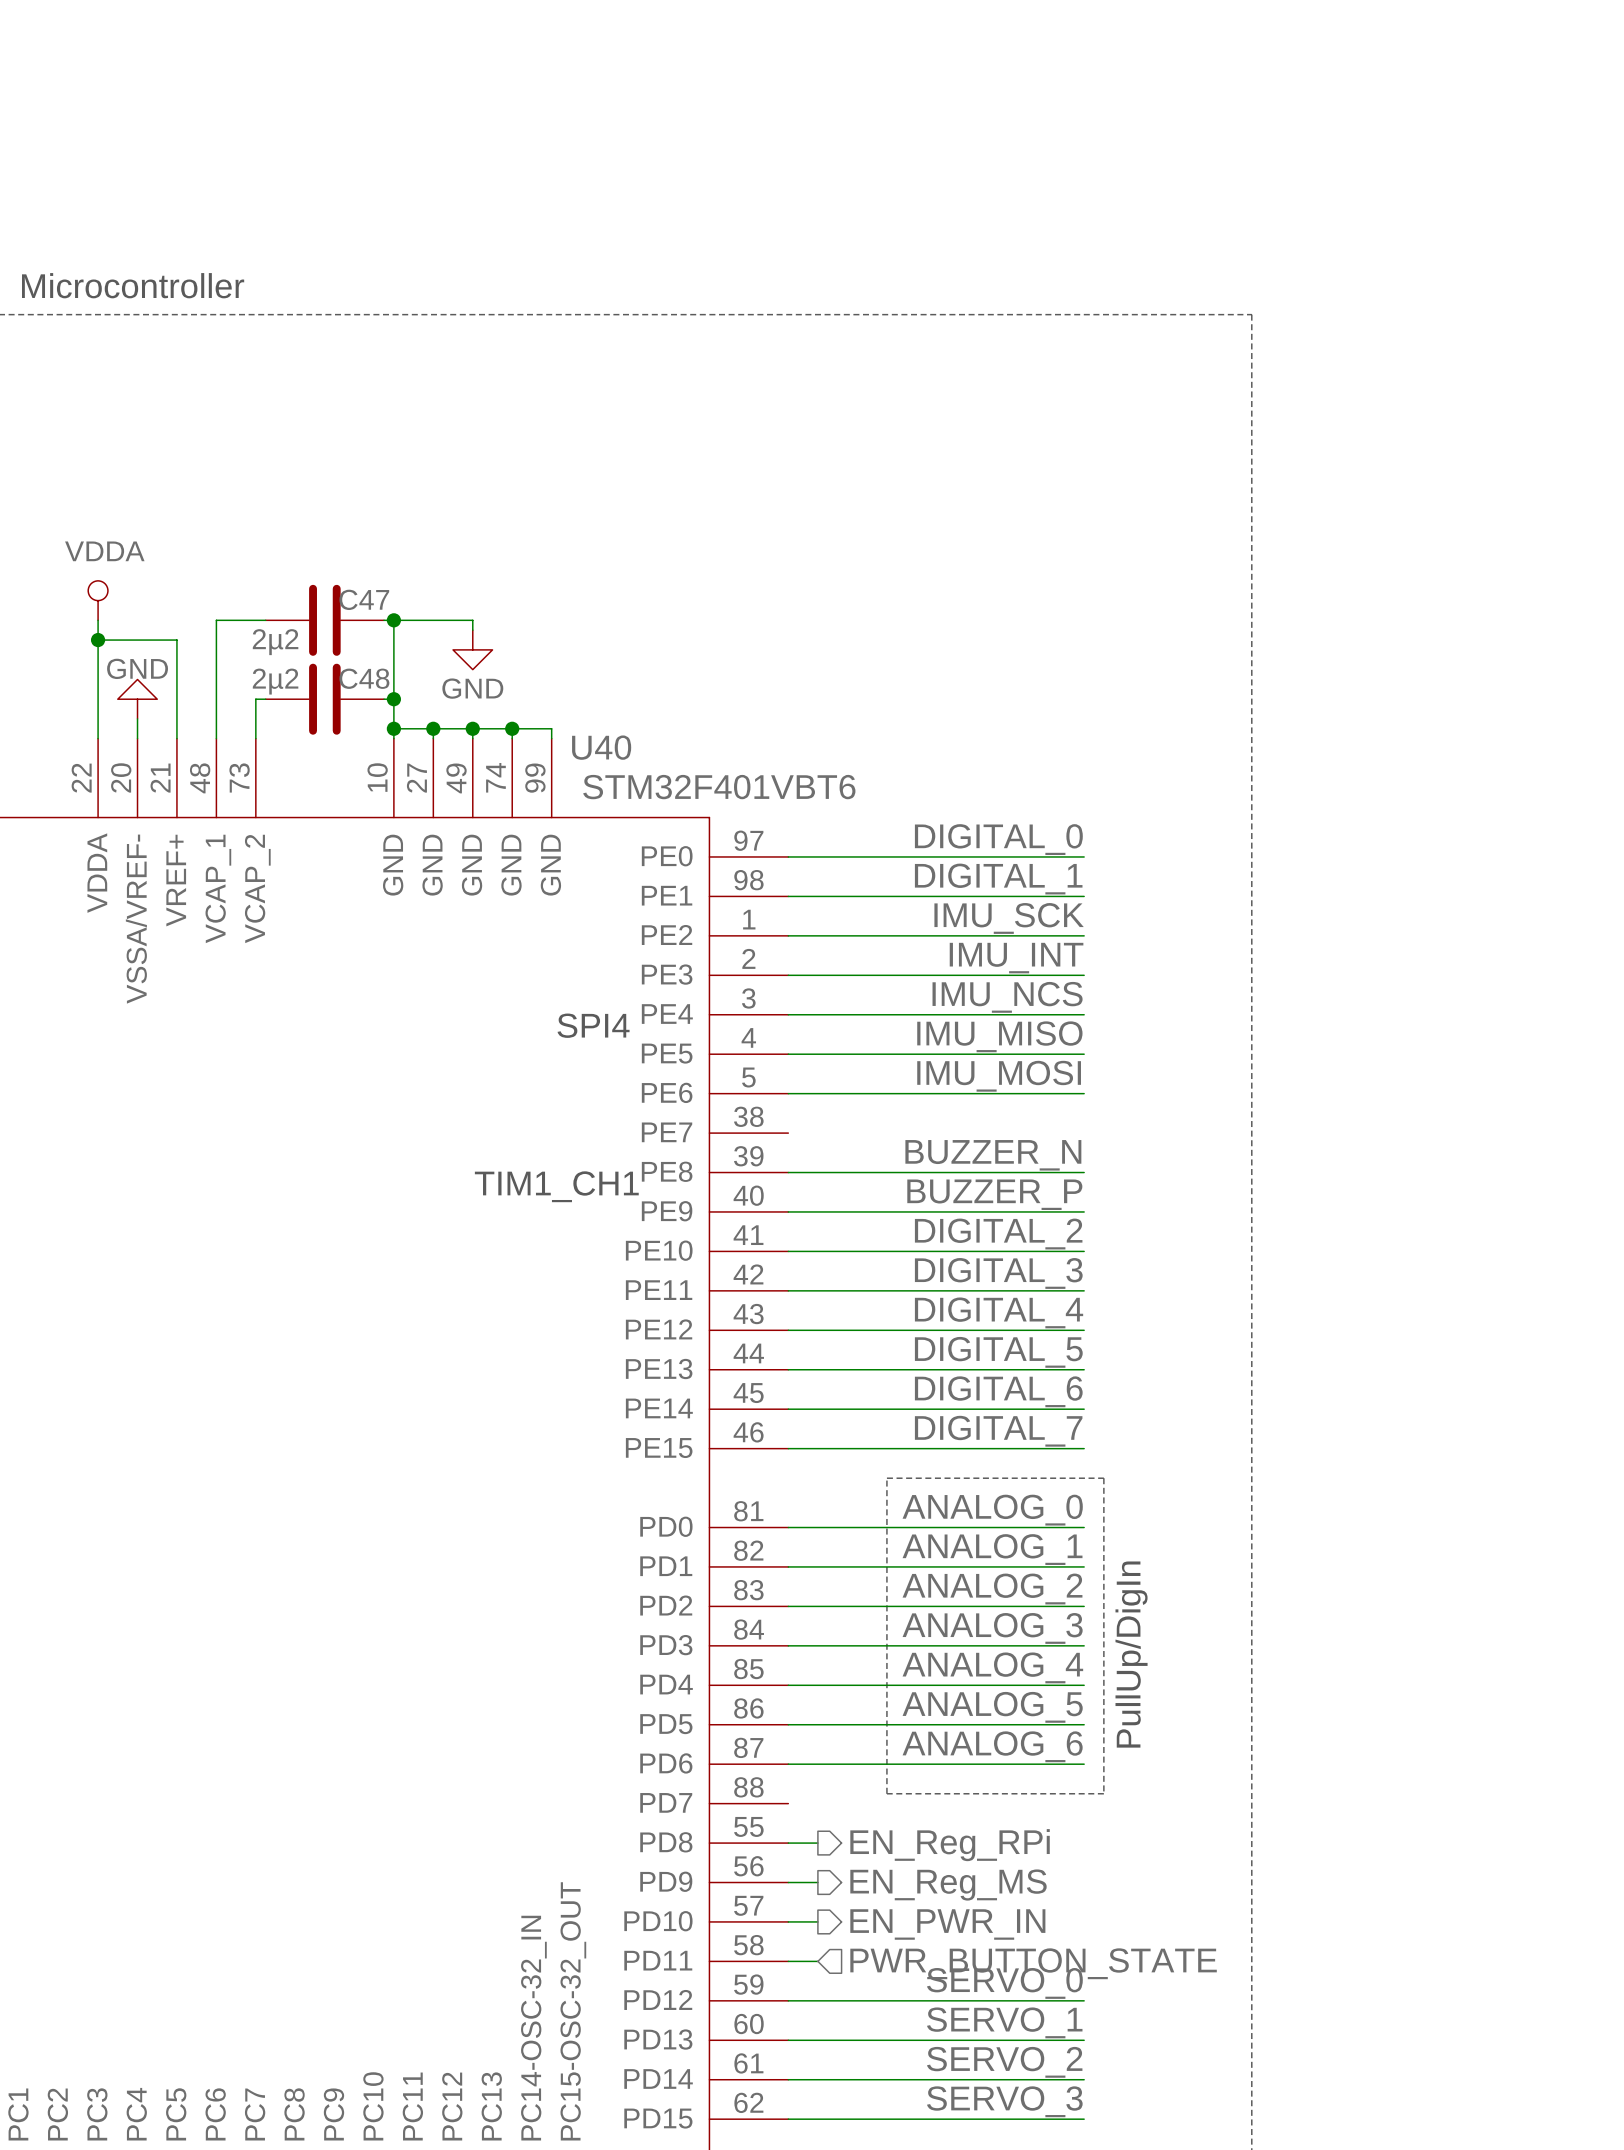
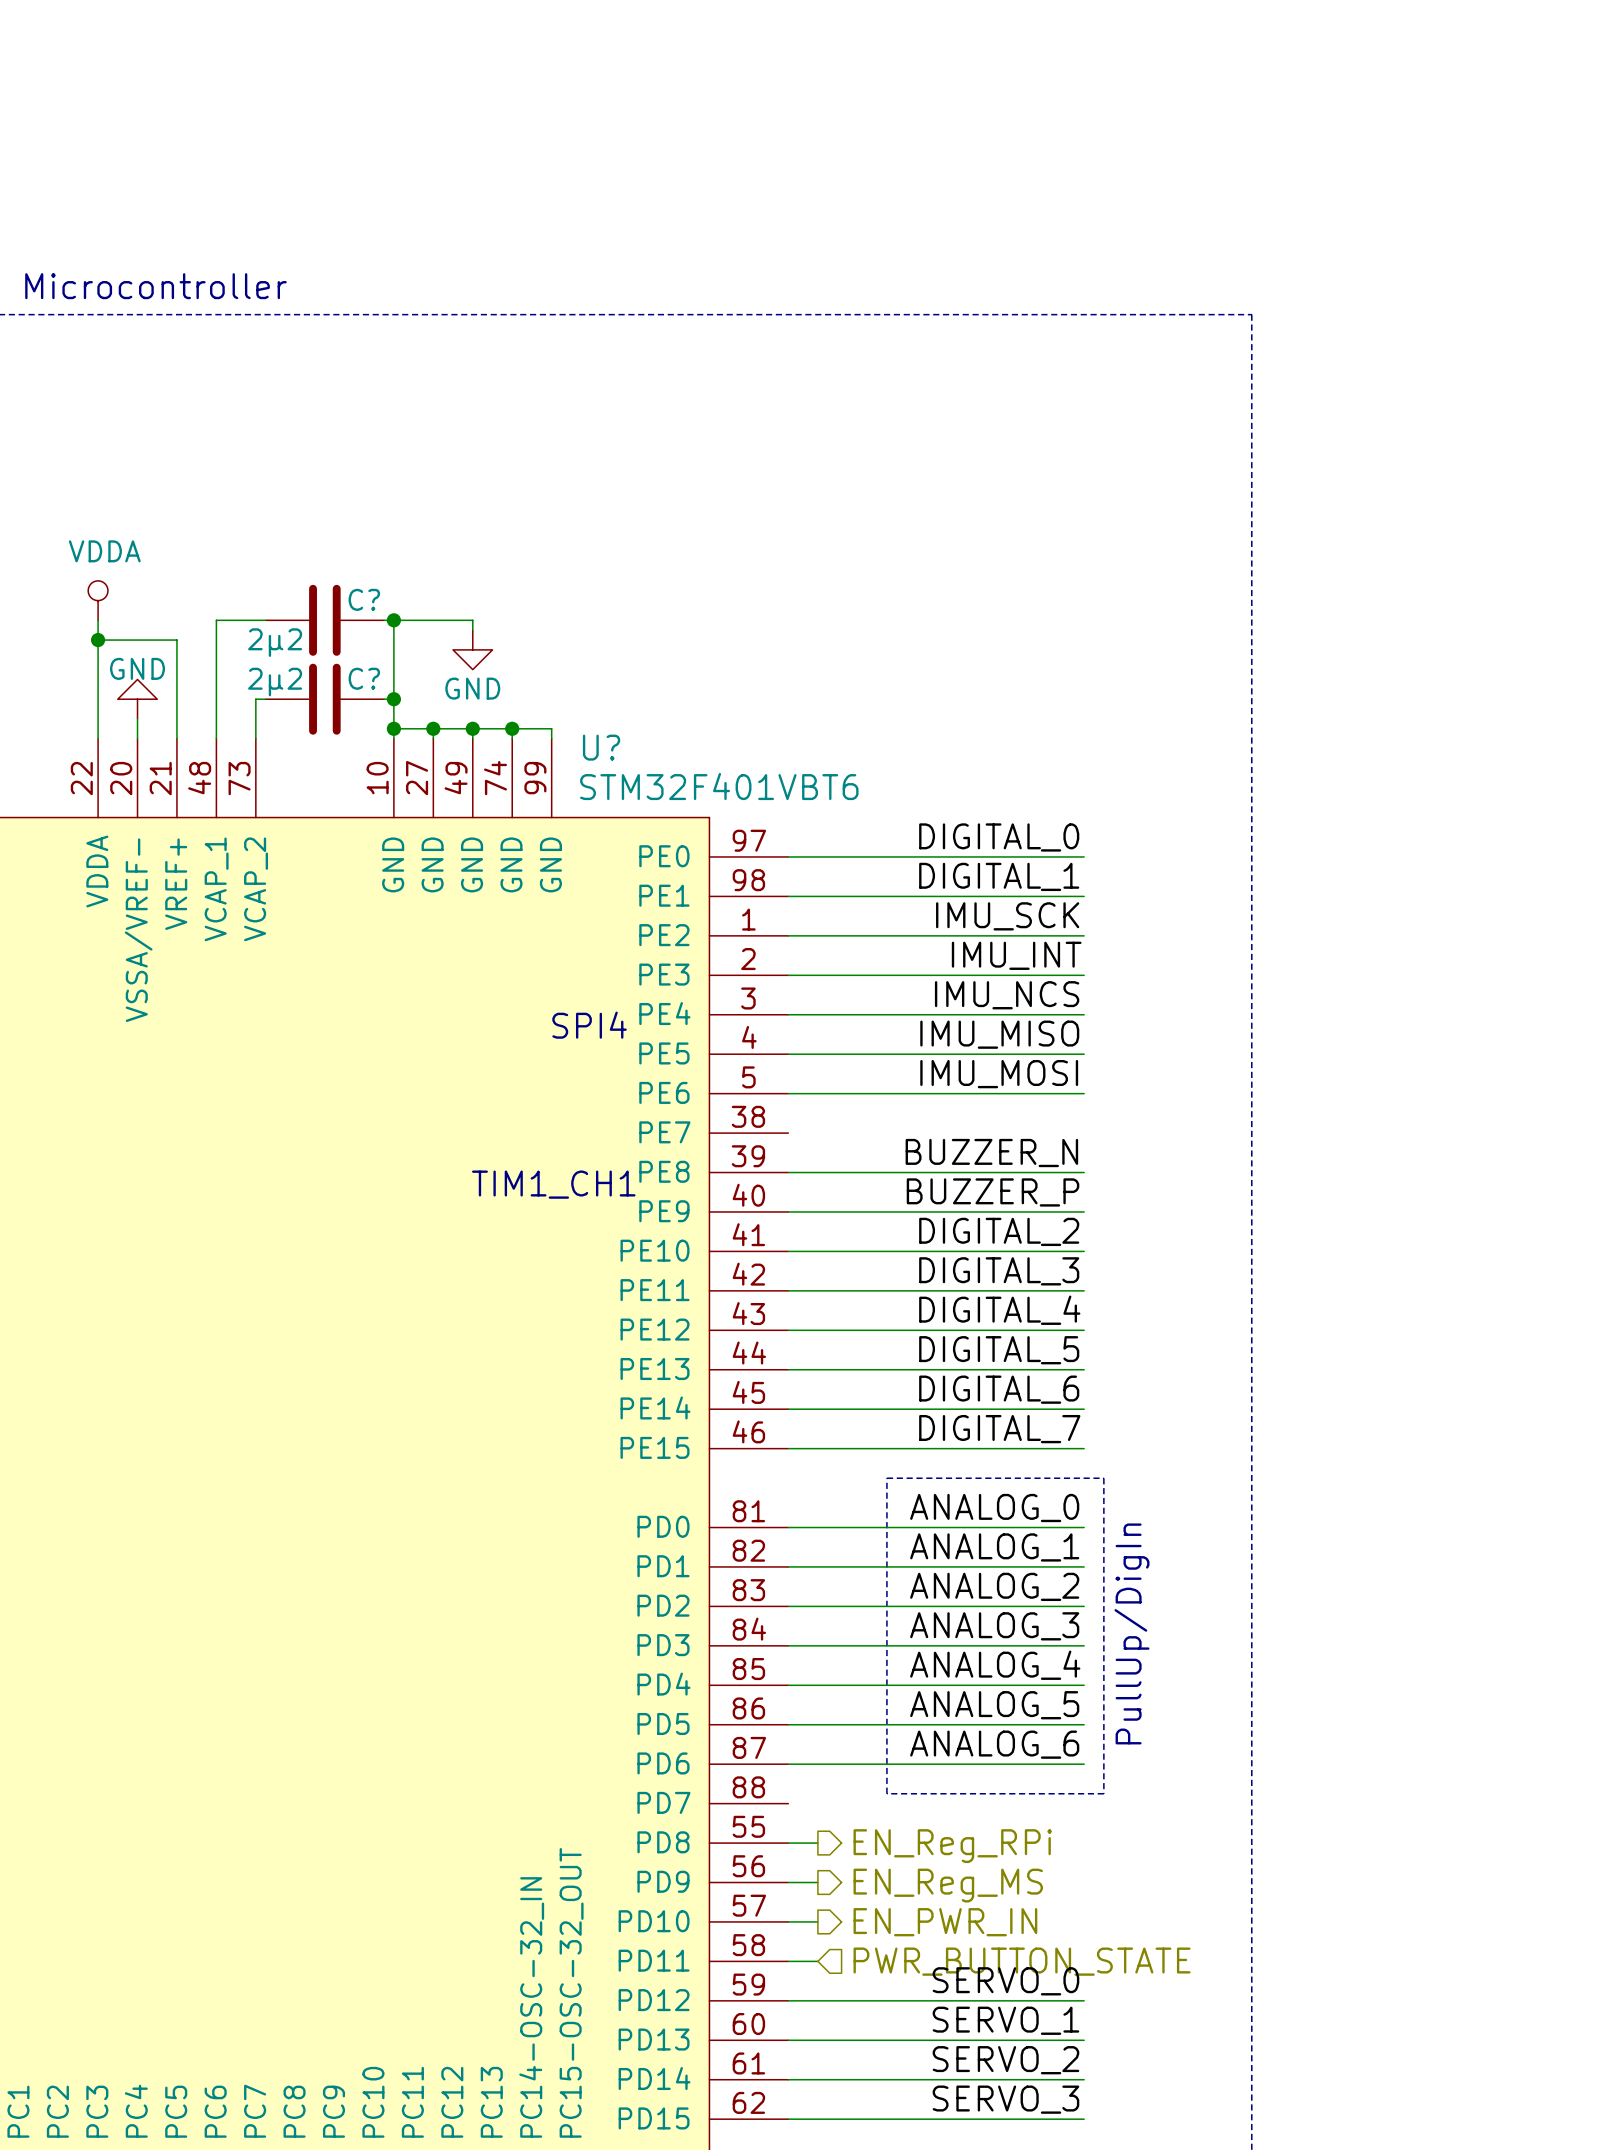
C47 name: C47 (364, 599) -> C? (364, 599)
C48 name: C48 (364, 678) -> C? (364, 678)
U40 name: U40 (601, 747) -> U? (601, 747)

